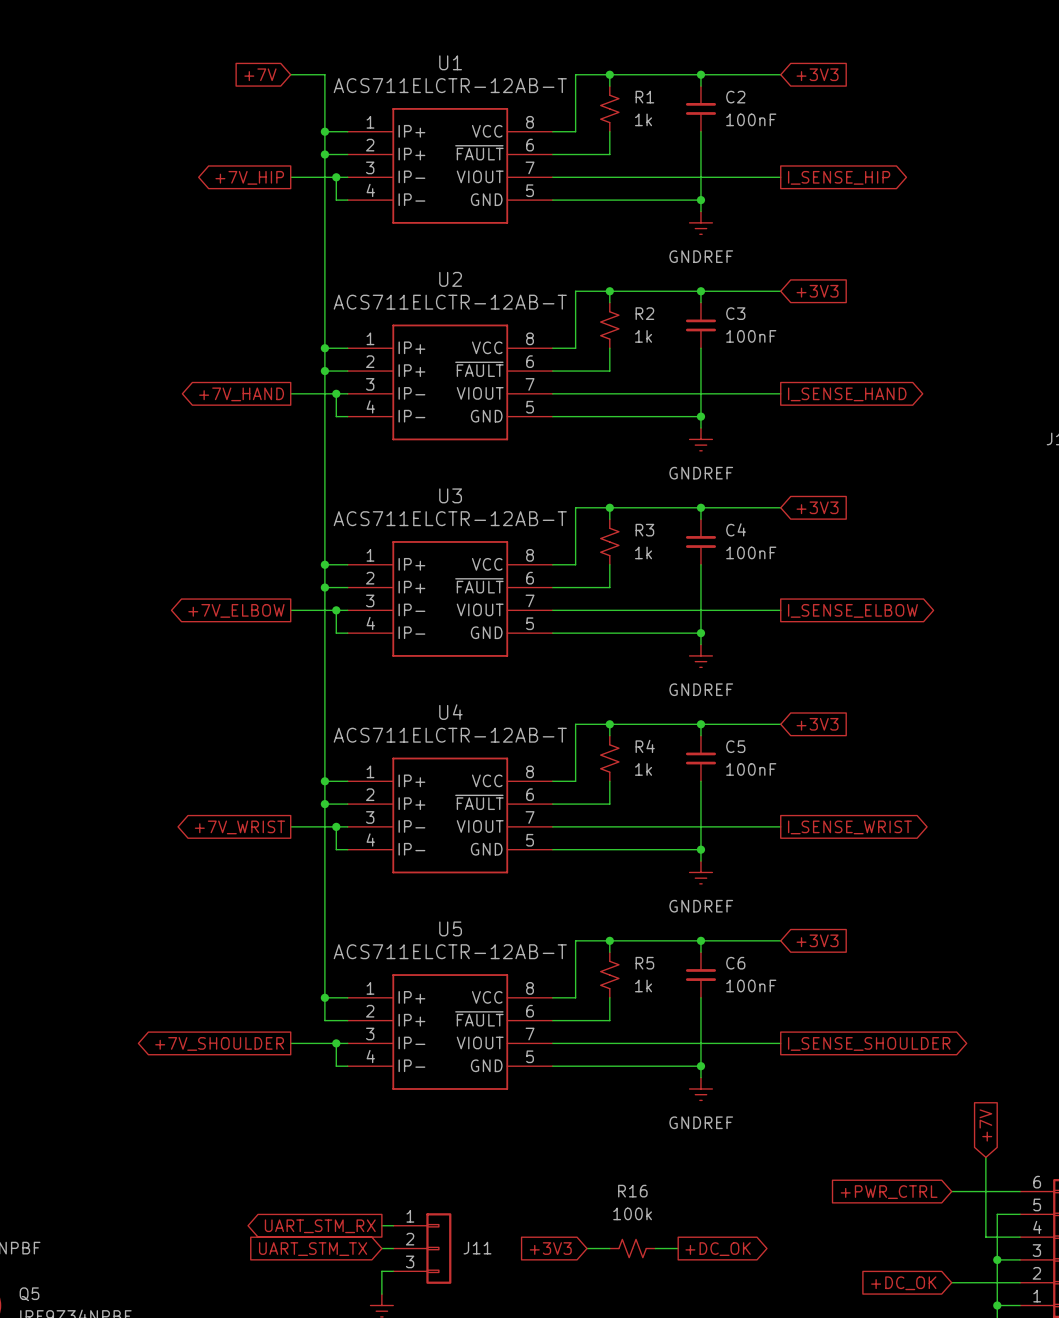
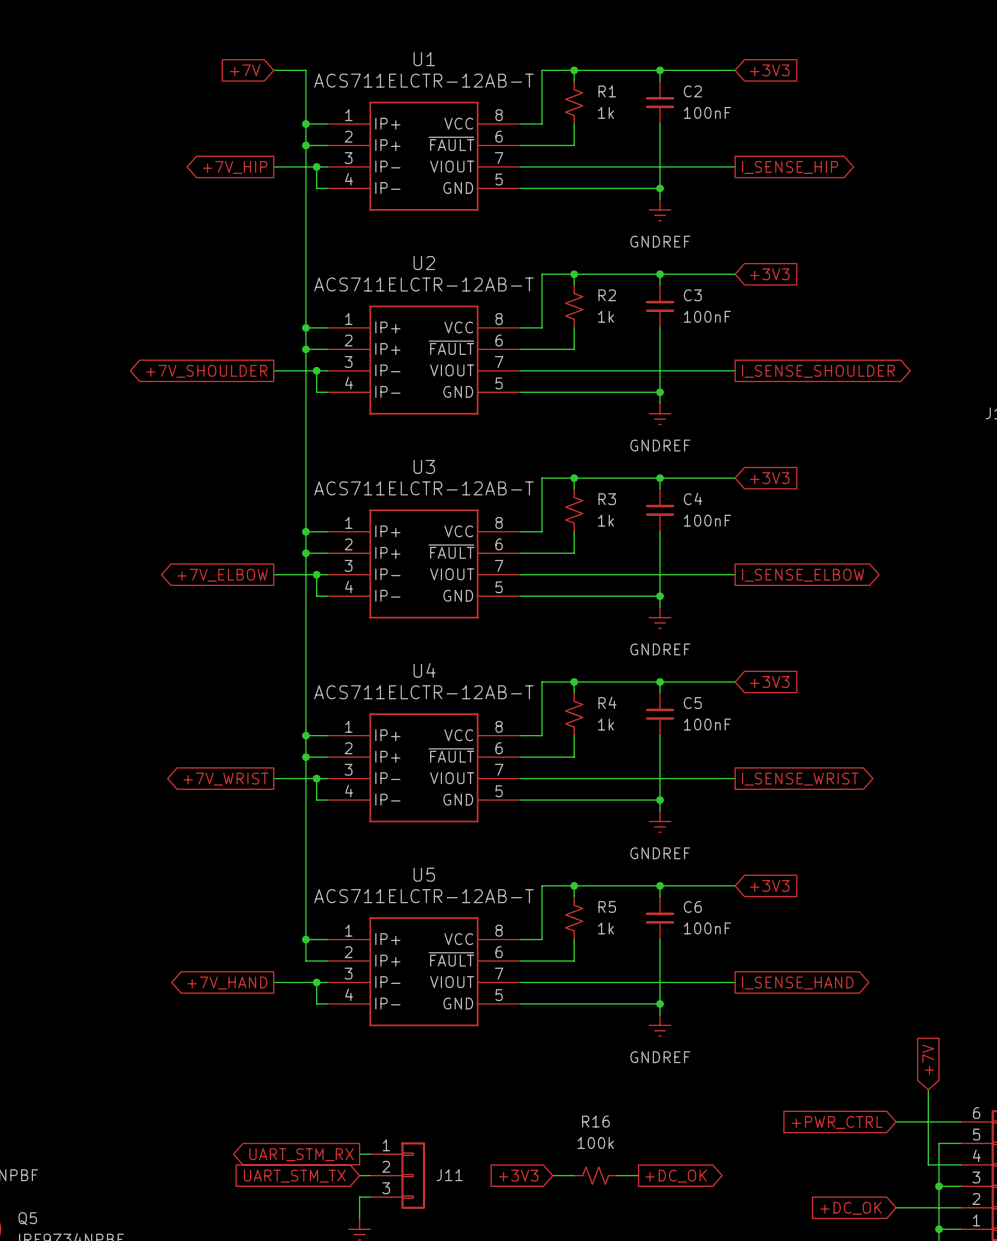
global label: +7V_HAND (241, 394) -> +7V_SHOULDER (206, 371)
global label: I_SENSE_HAND (847, 394) -> I_SENSE_SHOULDER (818, 371)
global label: +7V_SHOULDER (219, 1043) -> +7V_HAND (227, 982)
global label: I_SENSE_SHOULDER (869, 1043) -> I_SENSE_HAND (797, 982)

